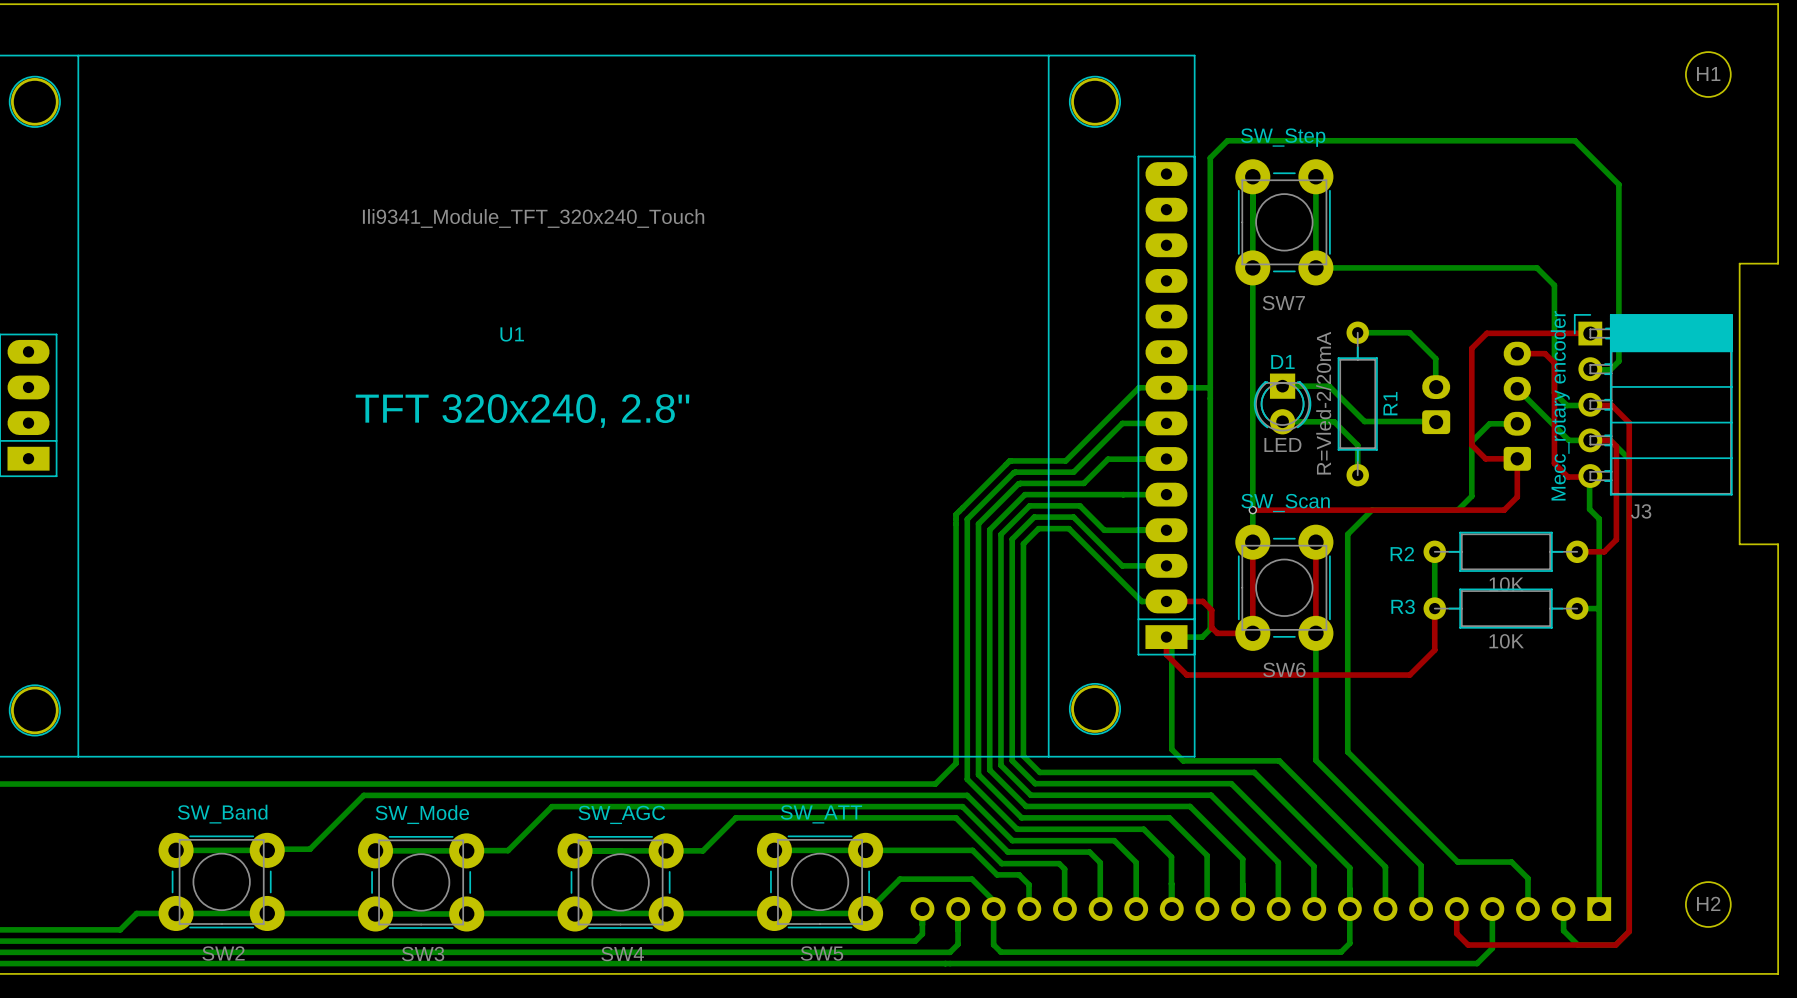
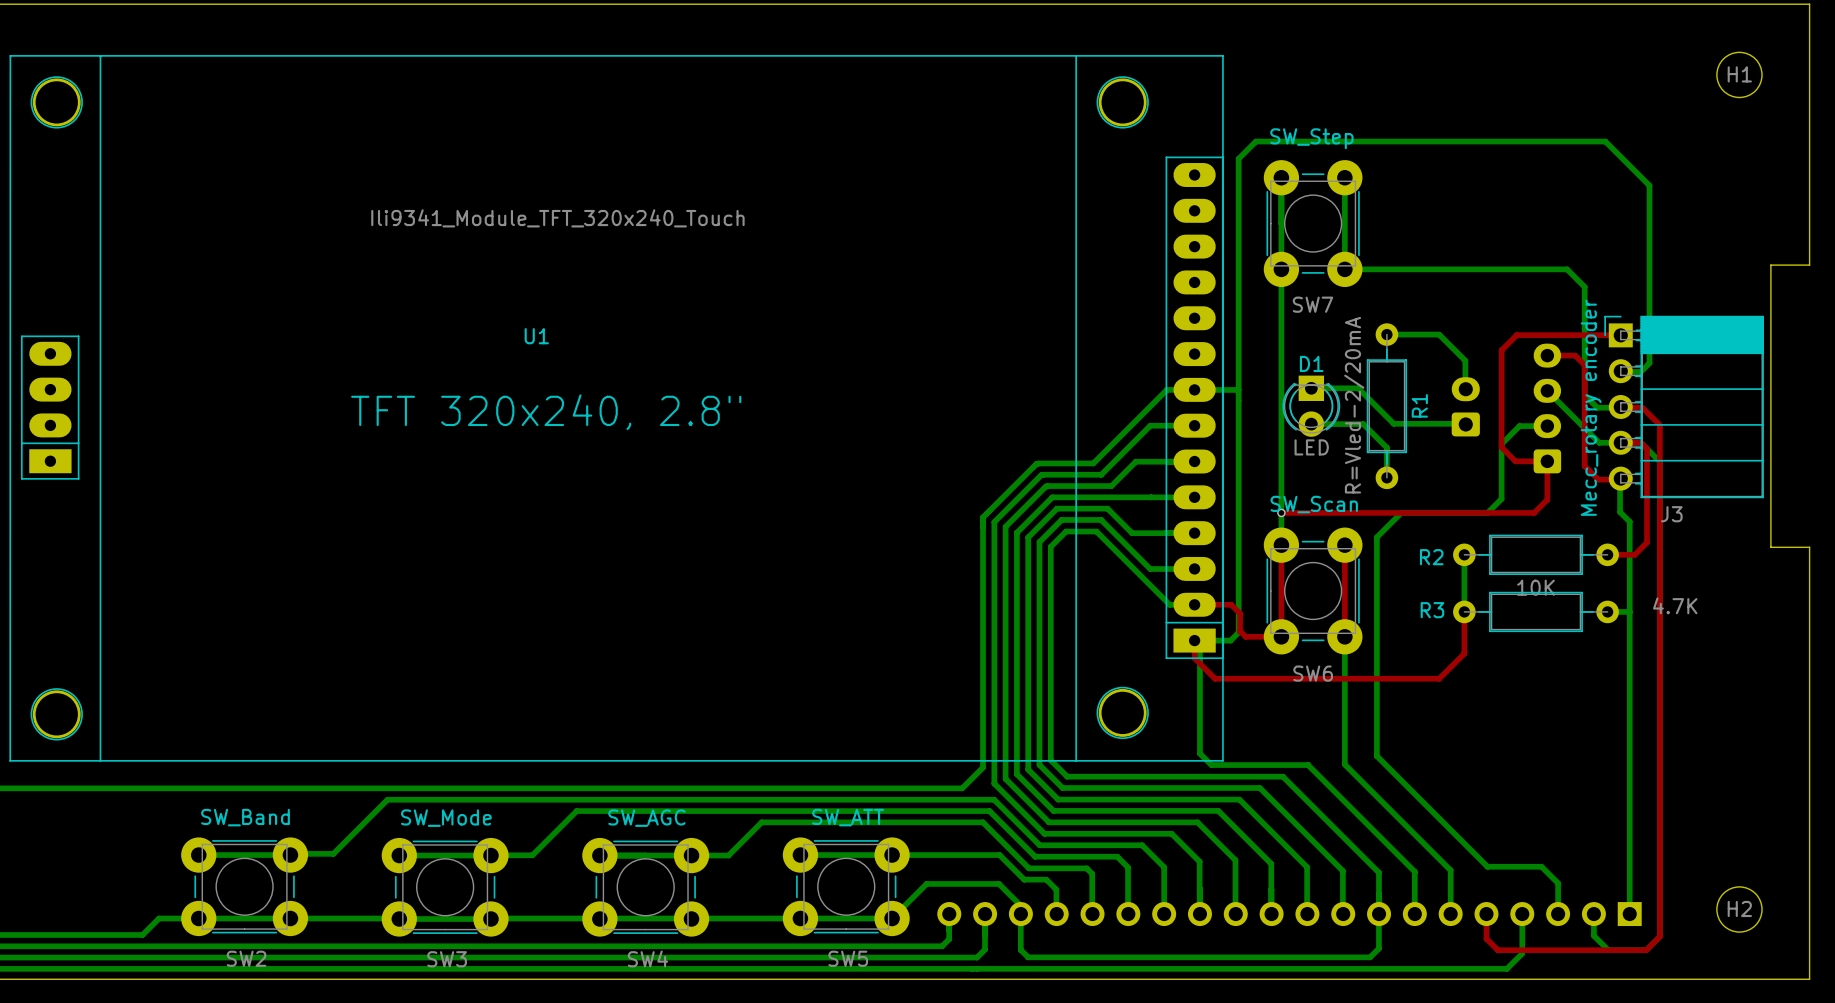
R3 value: 10K (1506, 641) -> 4.7K (1675, 605)

